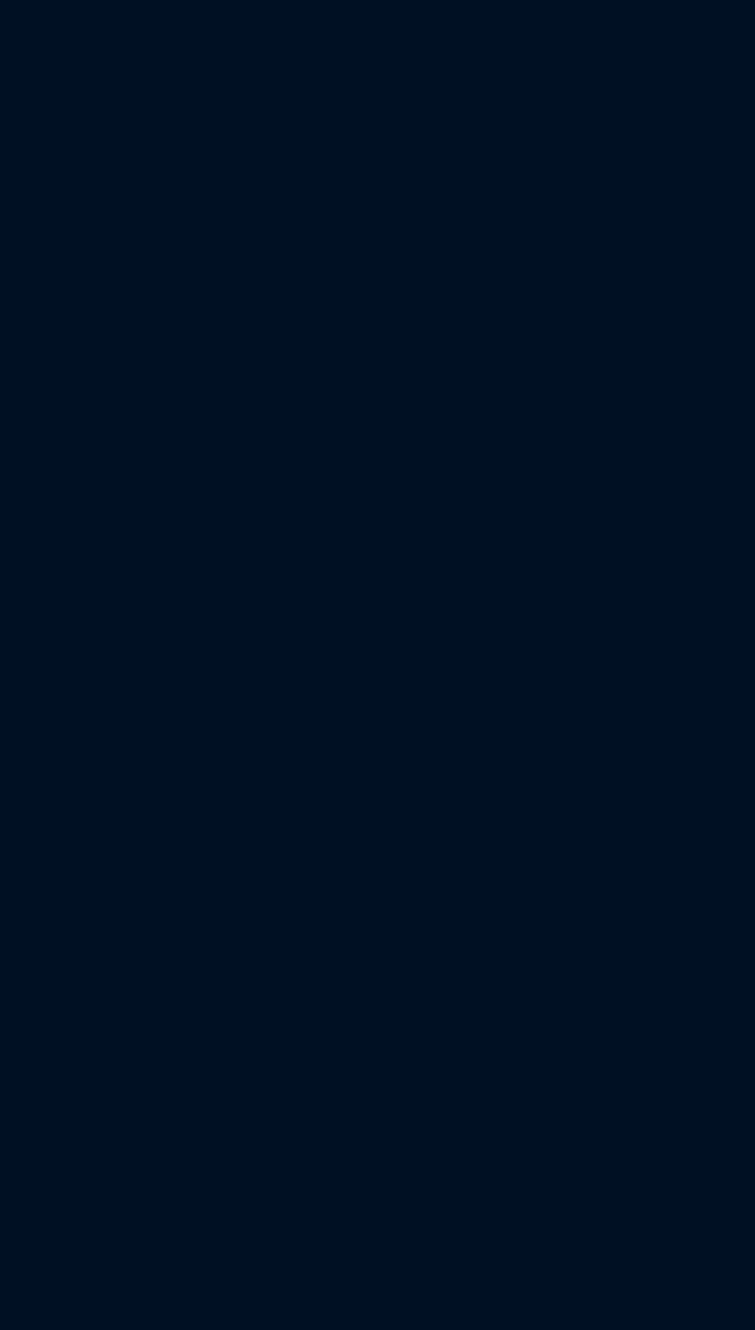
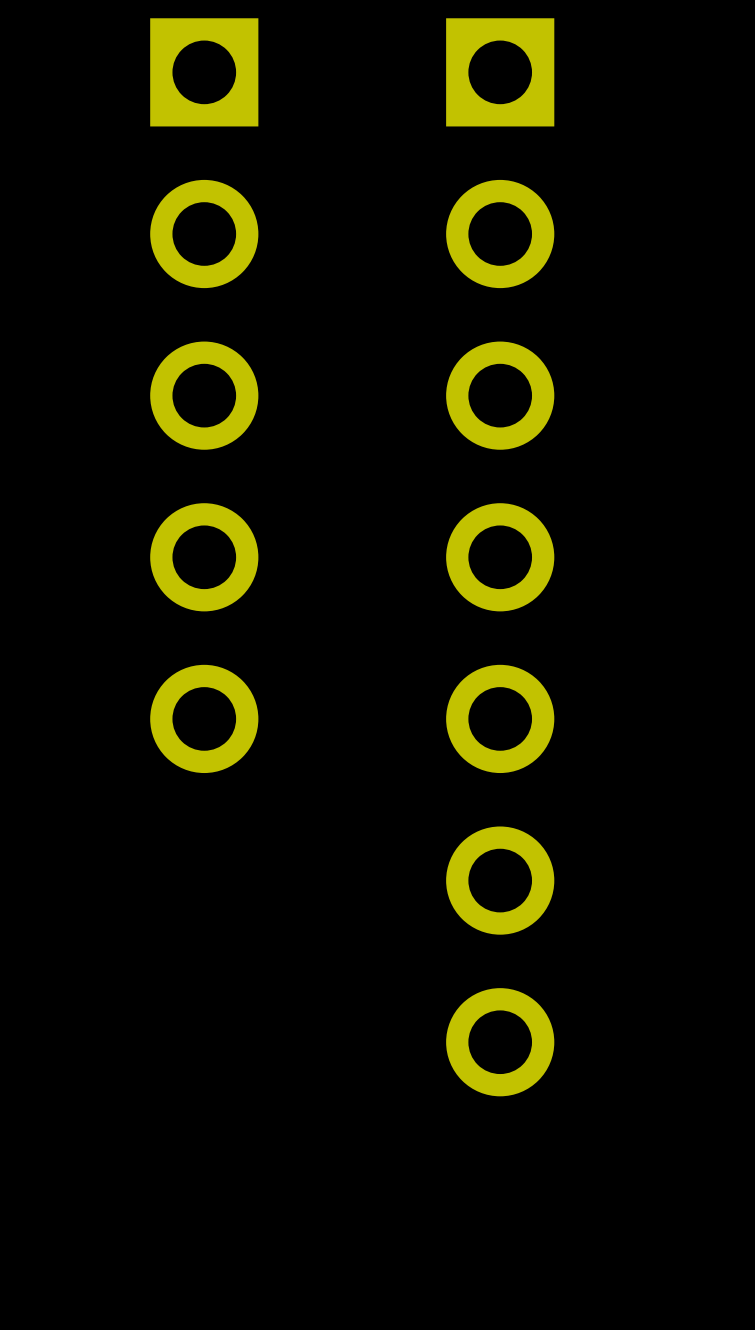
part: none -> (204, 395)
part: none -> (500, 557)

